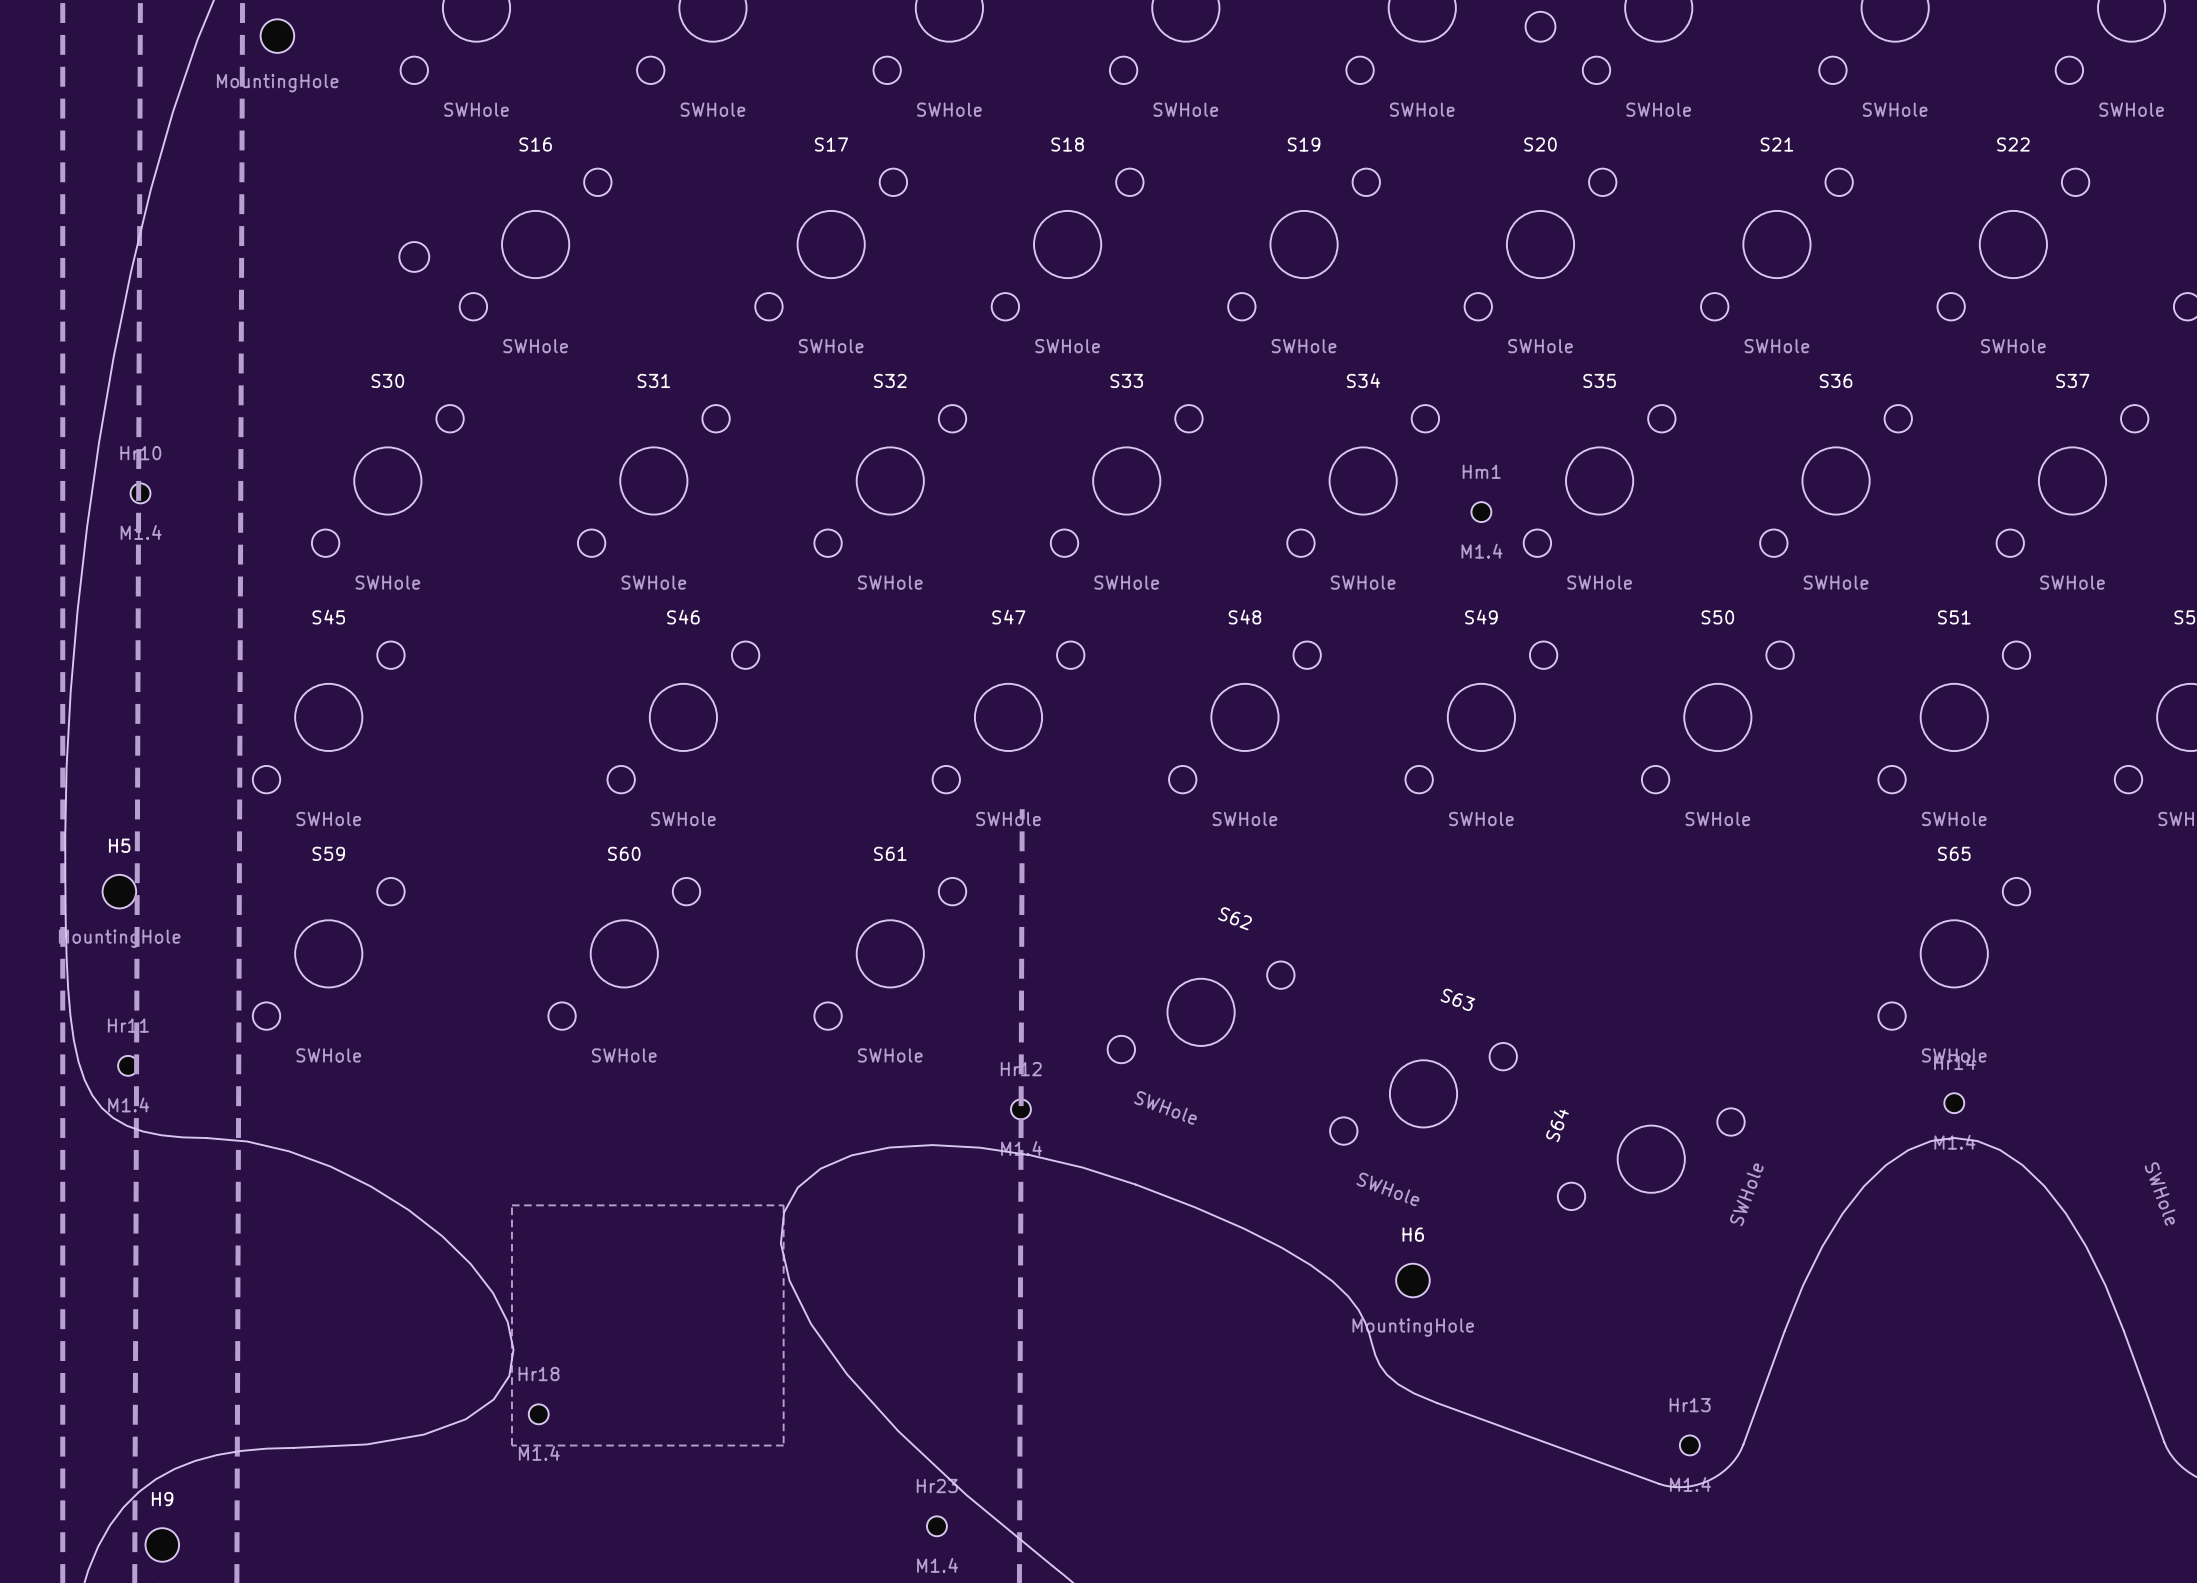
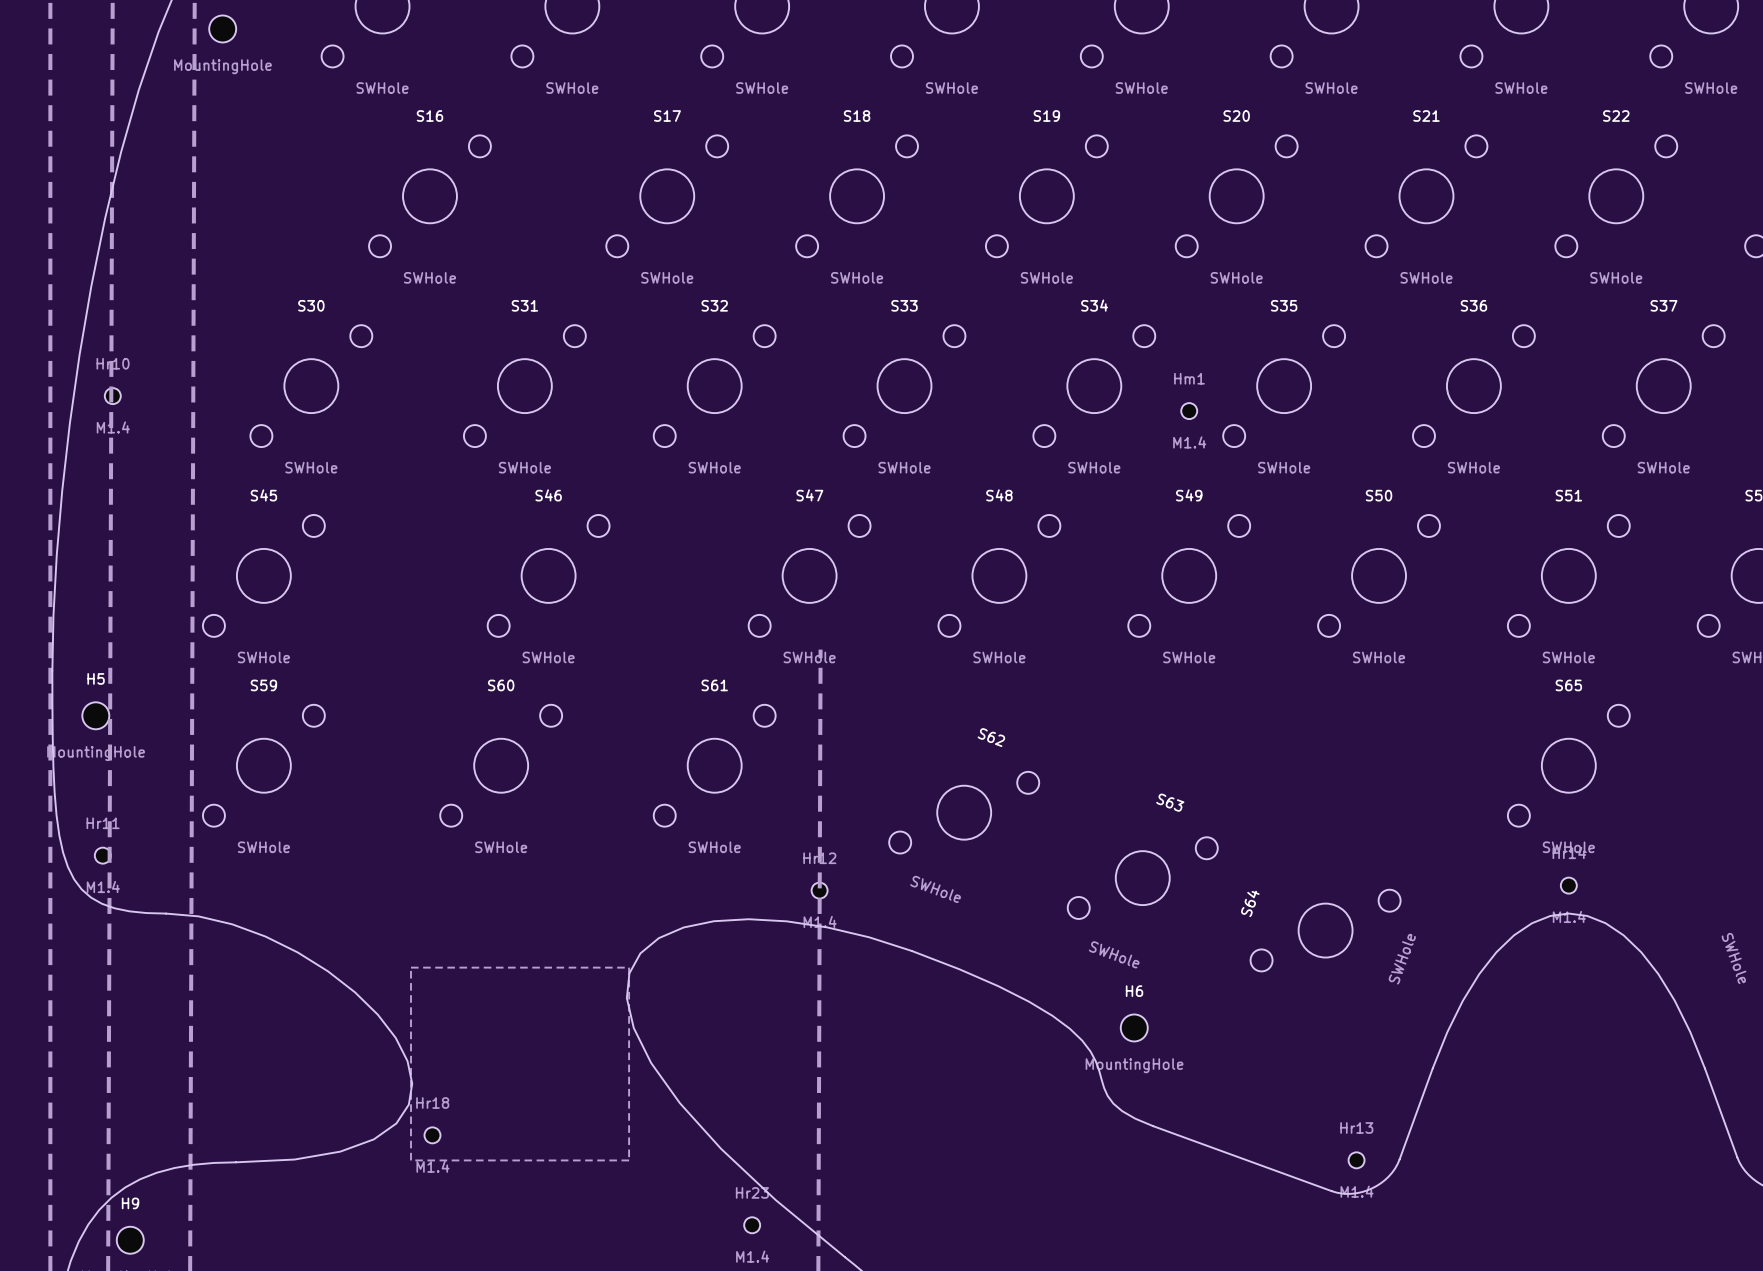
drawing: [1524, 11, 1557, 43] -> none
drawing: [398, 241, 430, 273] -> none

